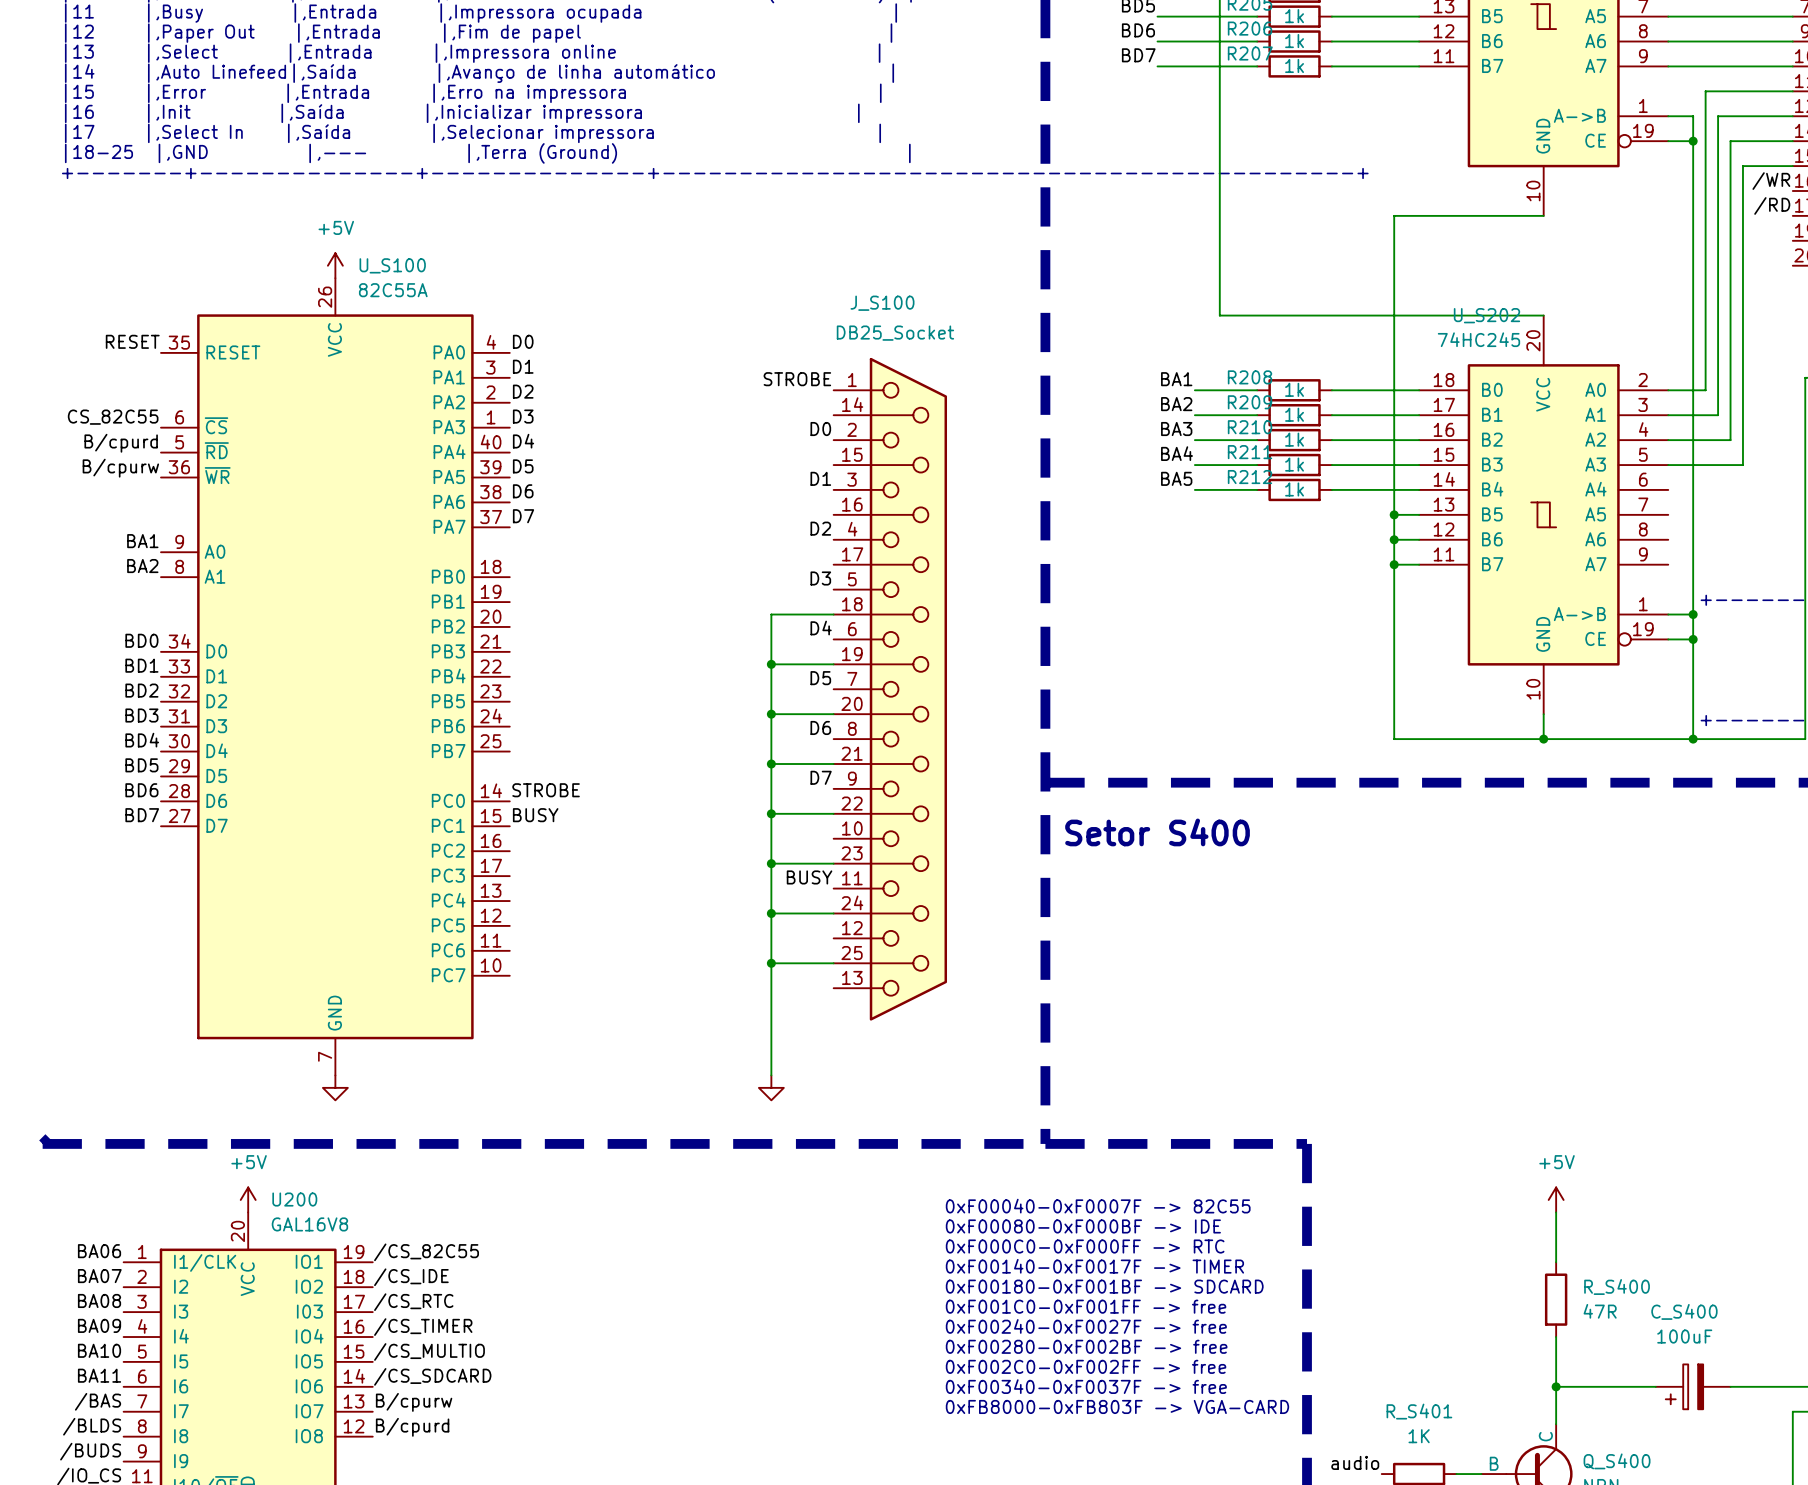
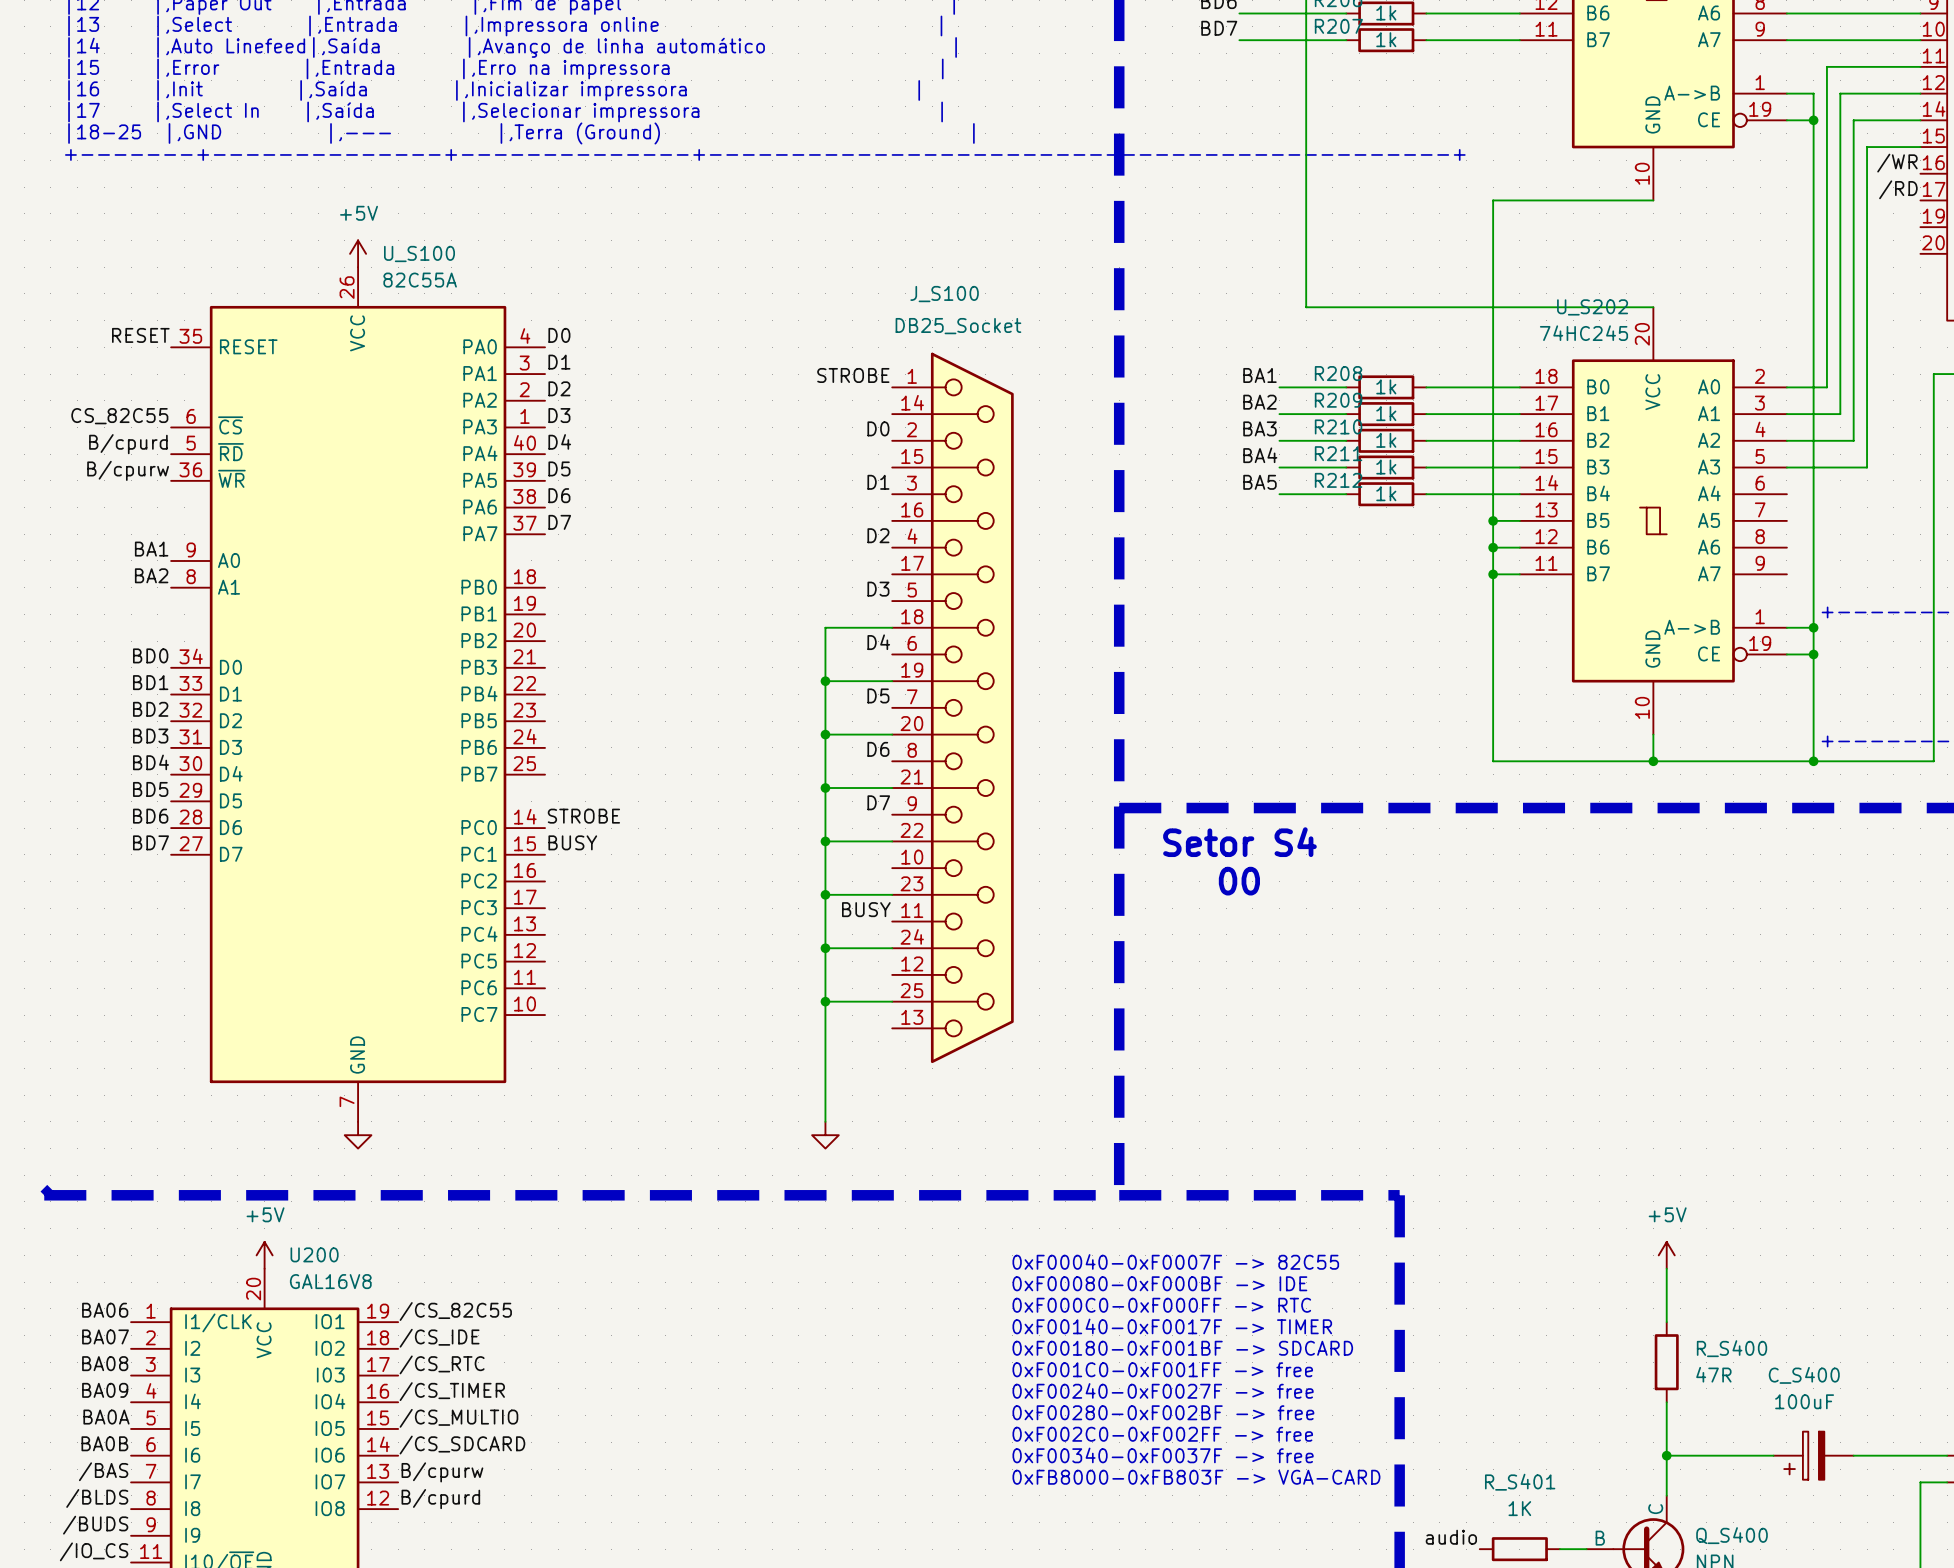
text: Setor S400 (1157, 832) -> Setor S4 (1239, 842)
text: none -> 00 (1239, 881)
label: BA10 (99, 1350) -> BA0A (106, 1417)
label: BA11 (99, 1375) -> BA0B (104, 1443)

